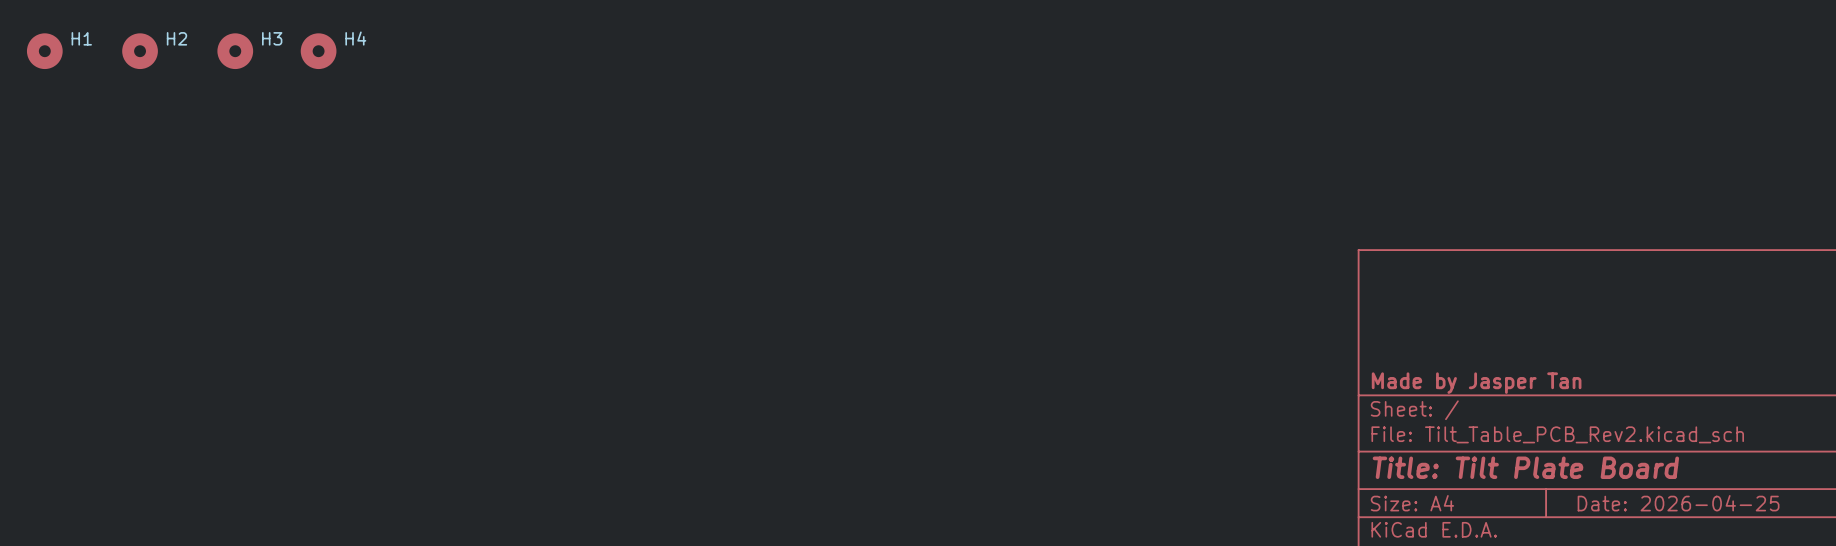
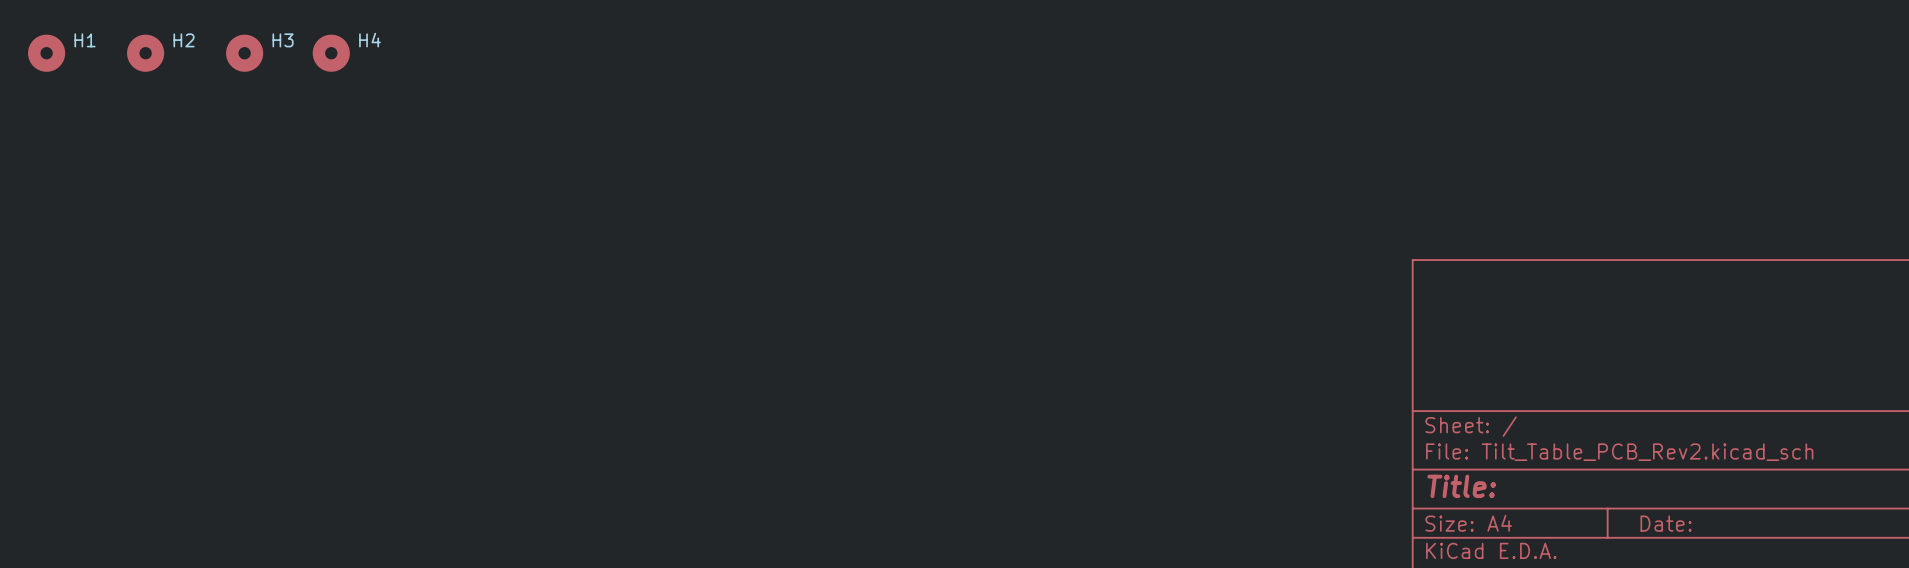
title block: Made by Jasper Tan (1476, 383) -> none
title block: Title: Tilt Plate Board (1525, 467) -> Title: (1461, 486)
title block: Date: 2026-04-25 (1678, 503) -> Date: (1666, 523)

